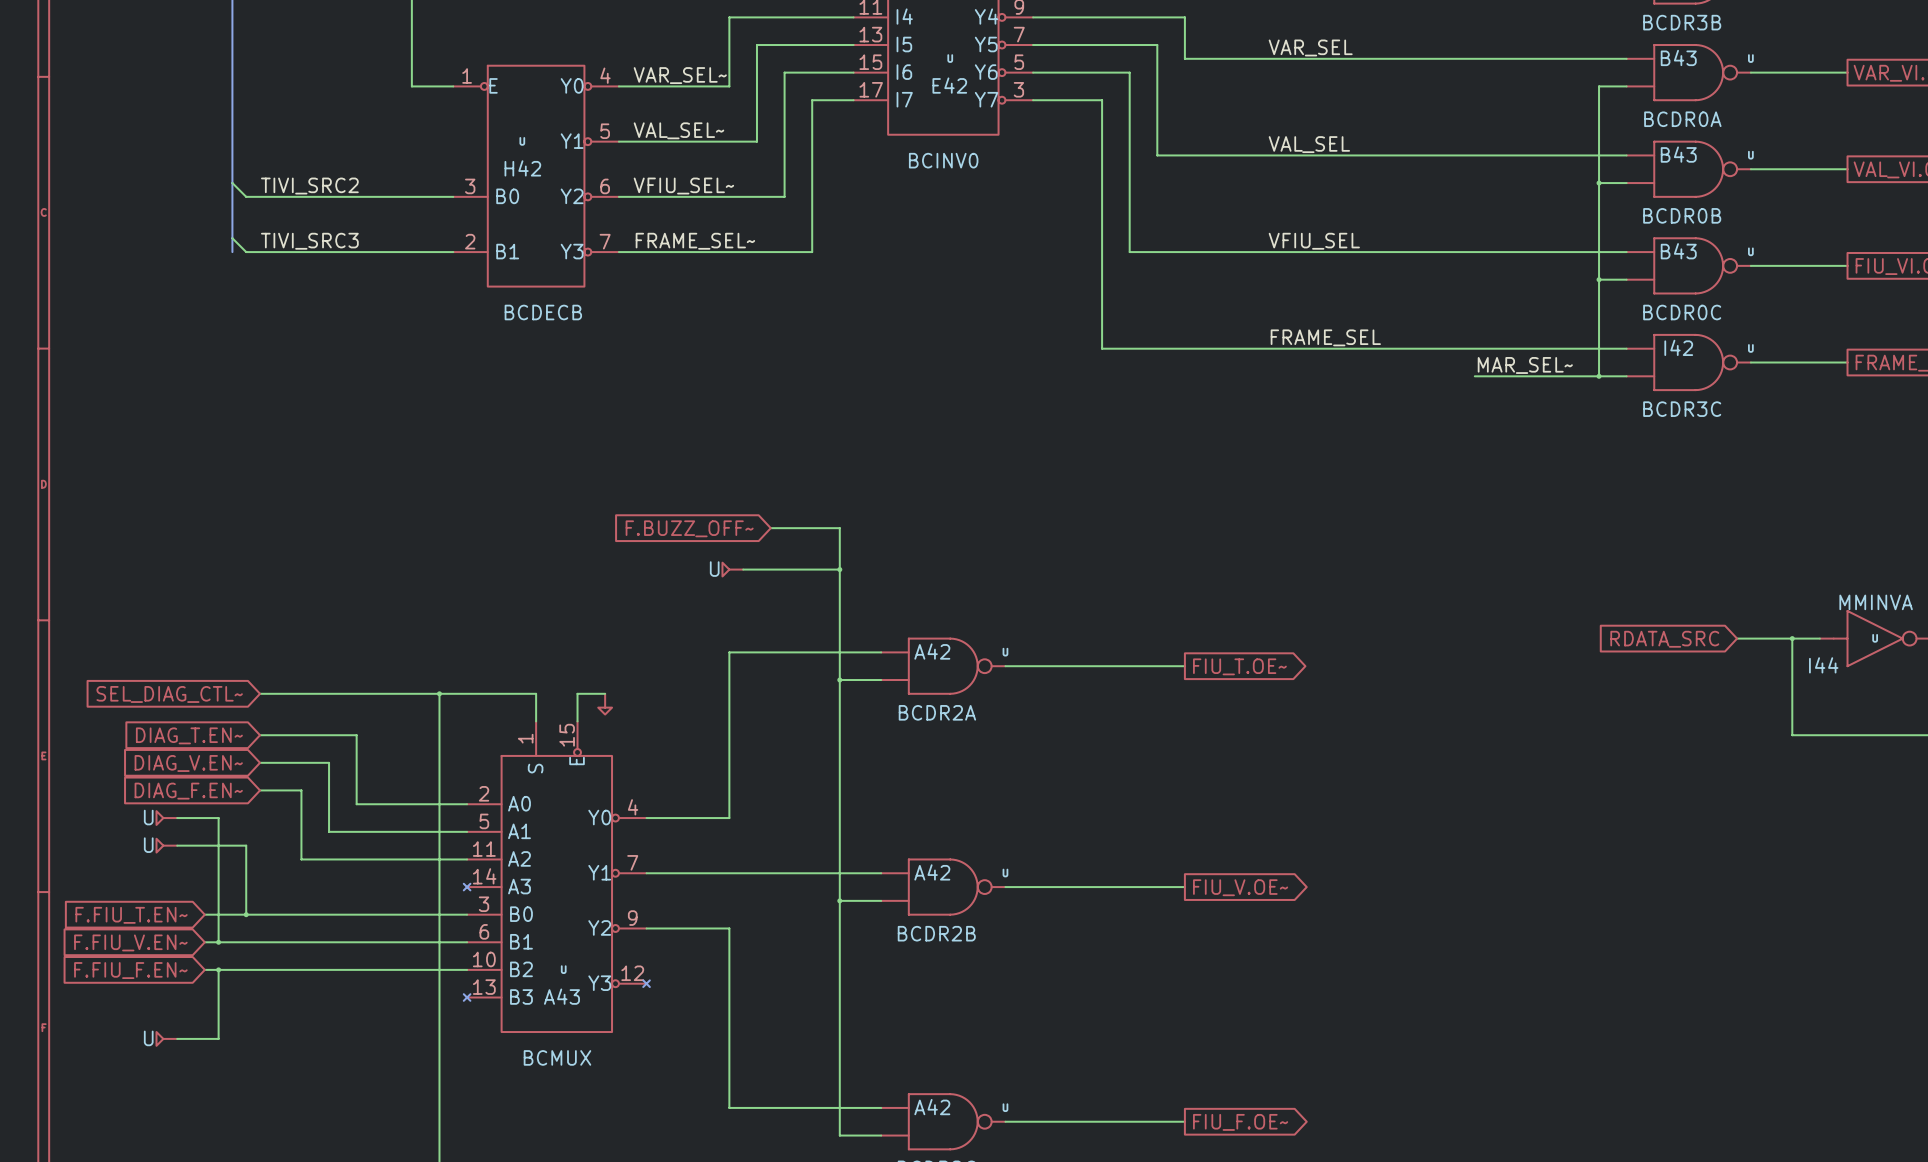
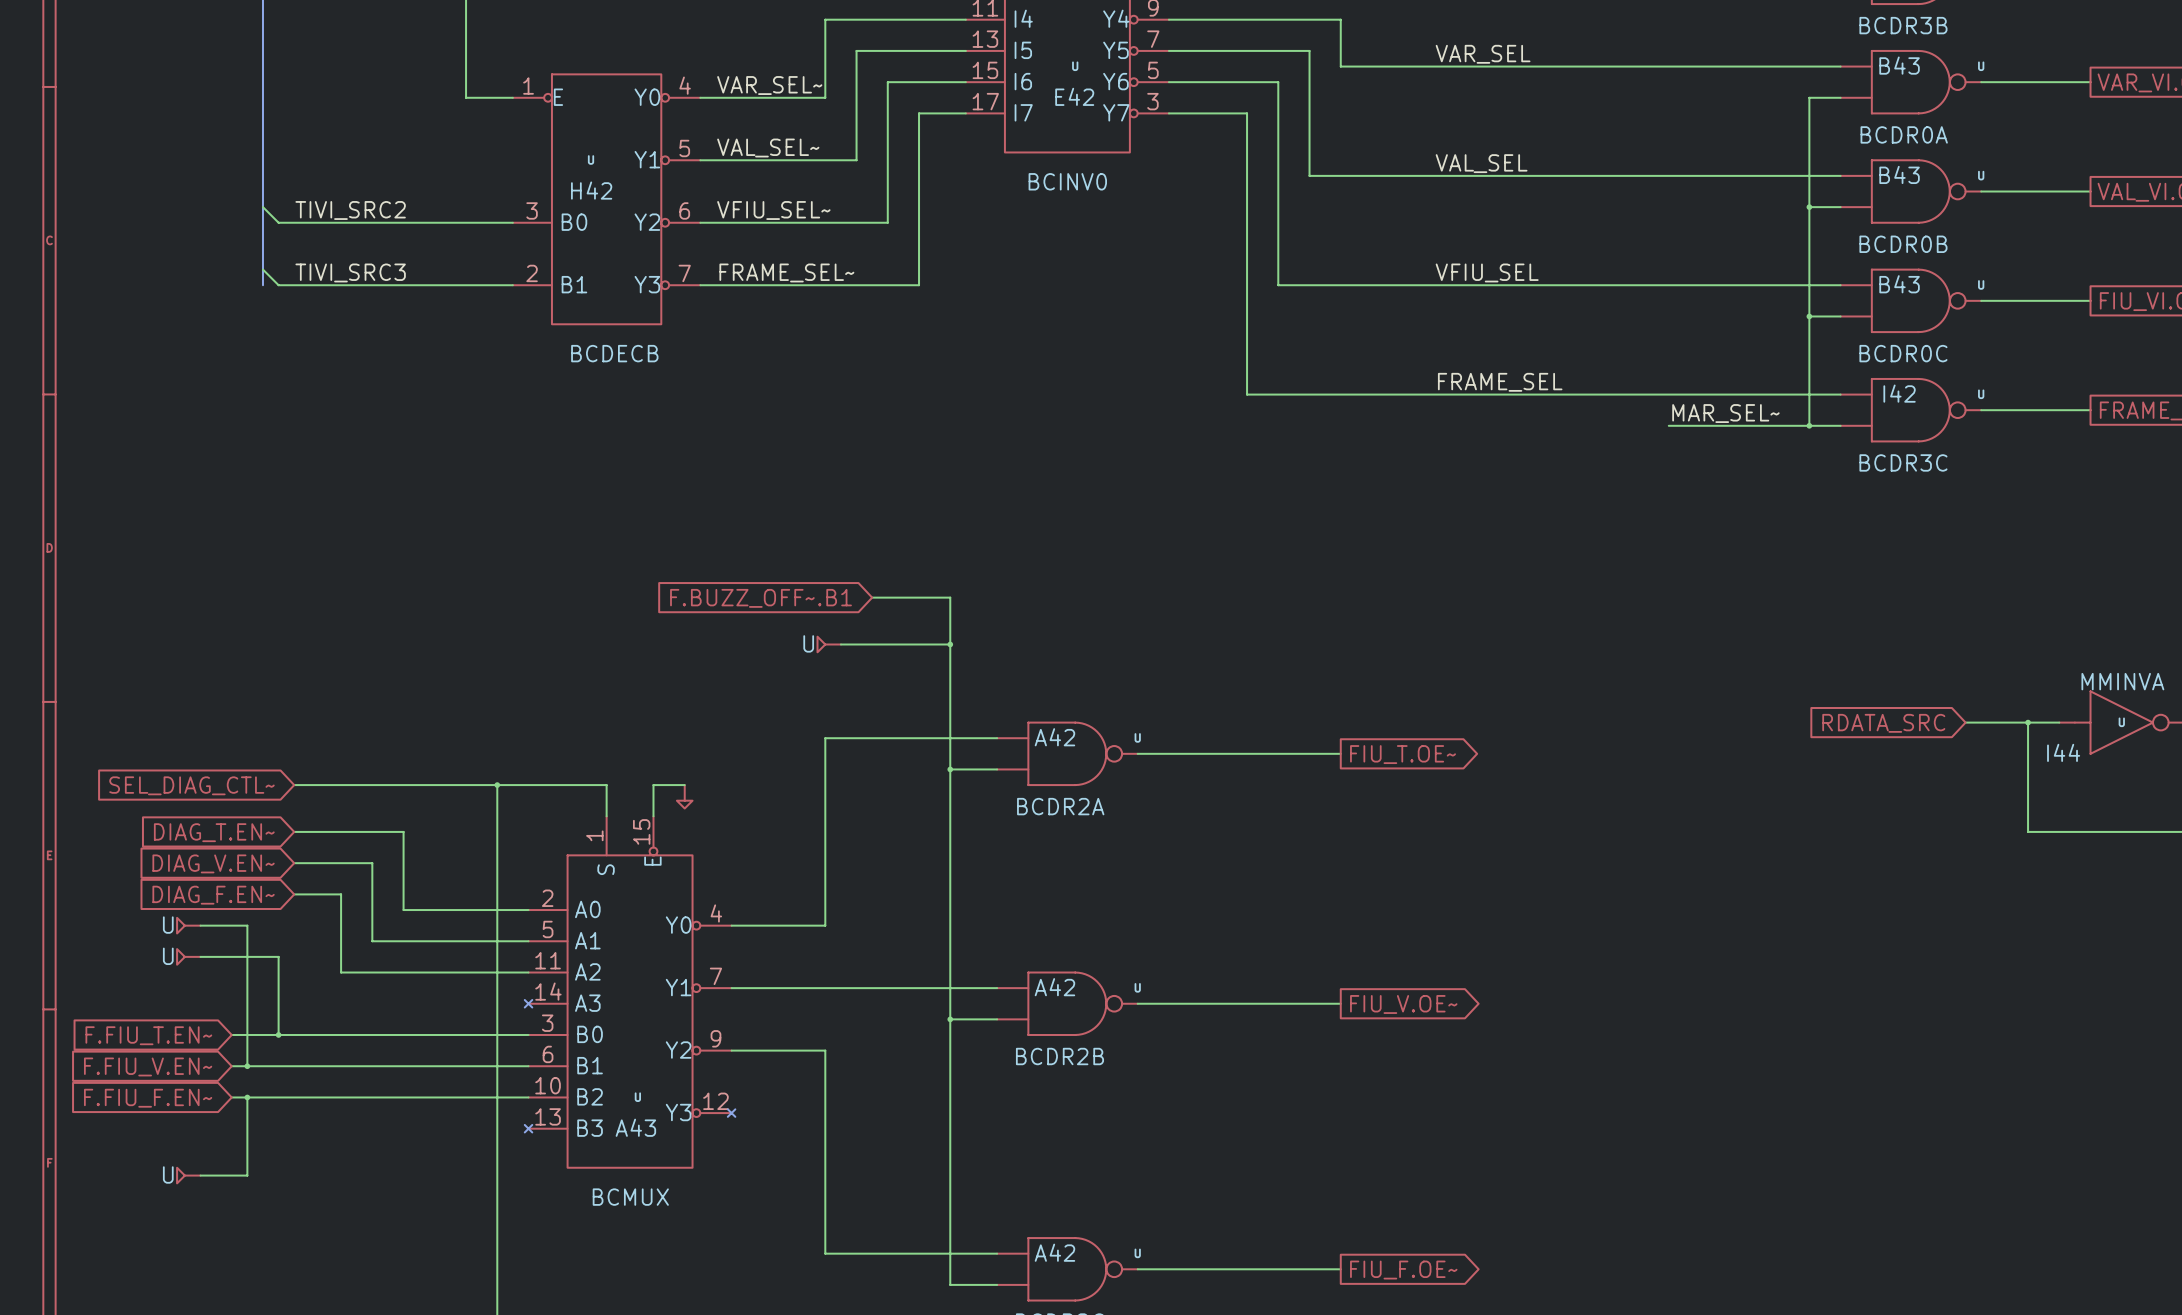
global label: F.BUZZ_OFF~ (689, 528) -> F.BUZZ_OFF~.B1 (761, 598)

